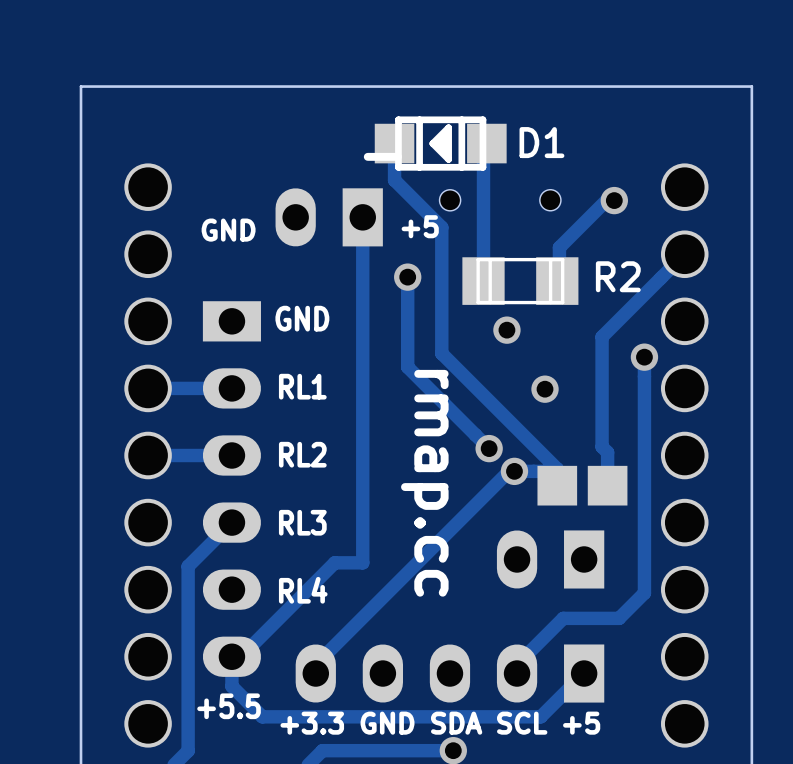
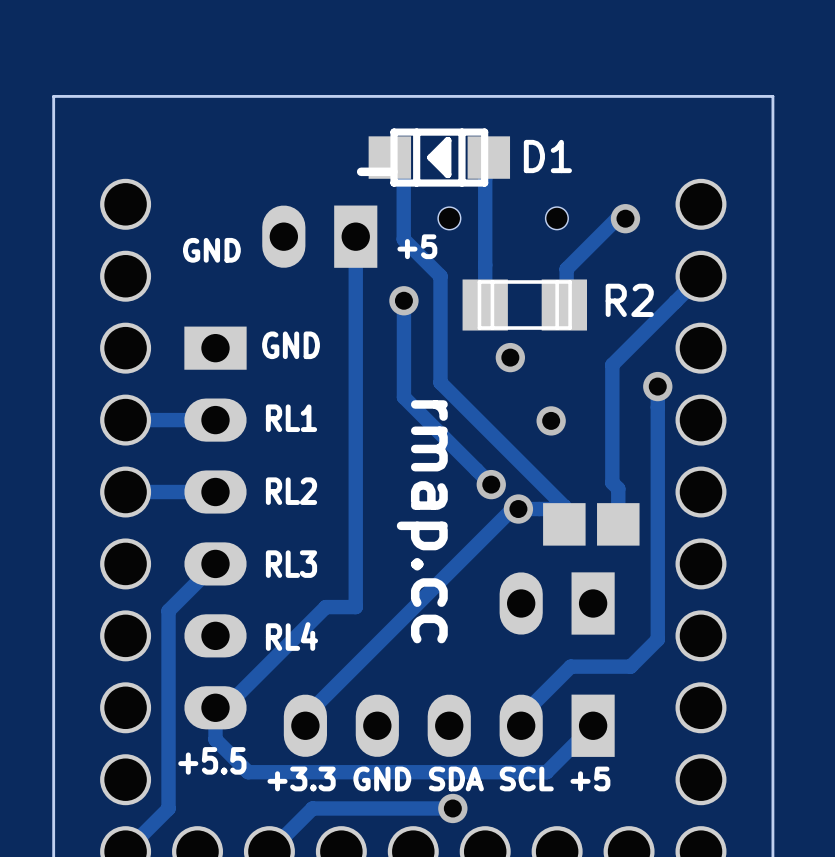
track: (394, 143) (394, 180) (441, 227) (441, 254) -> (403, 156) (403, 239) (440, 276)

